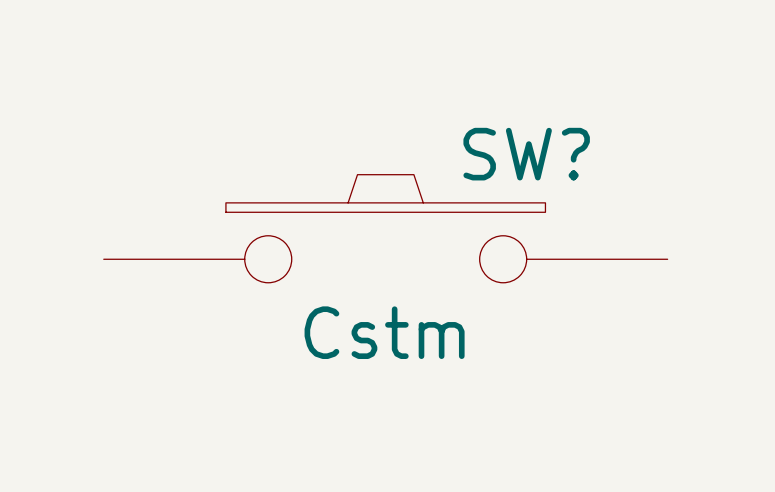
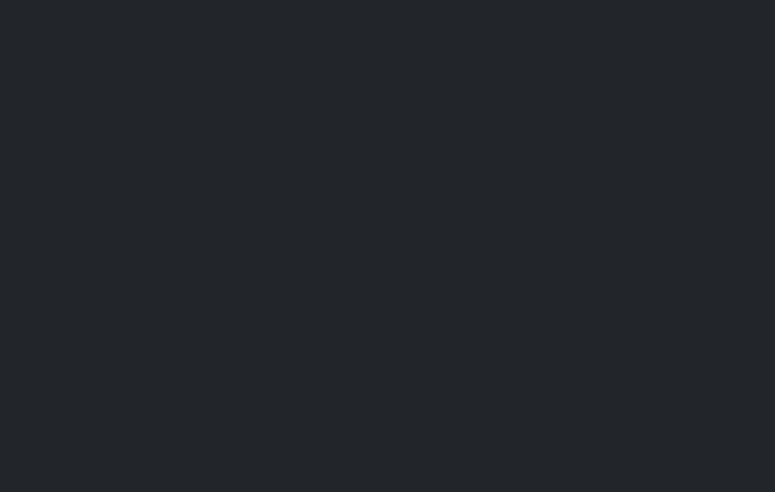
SW?: Cstm (385, 228) -> none

